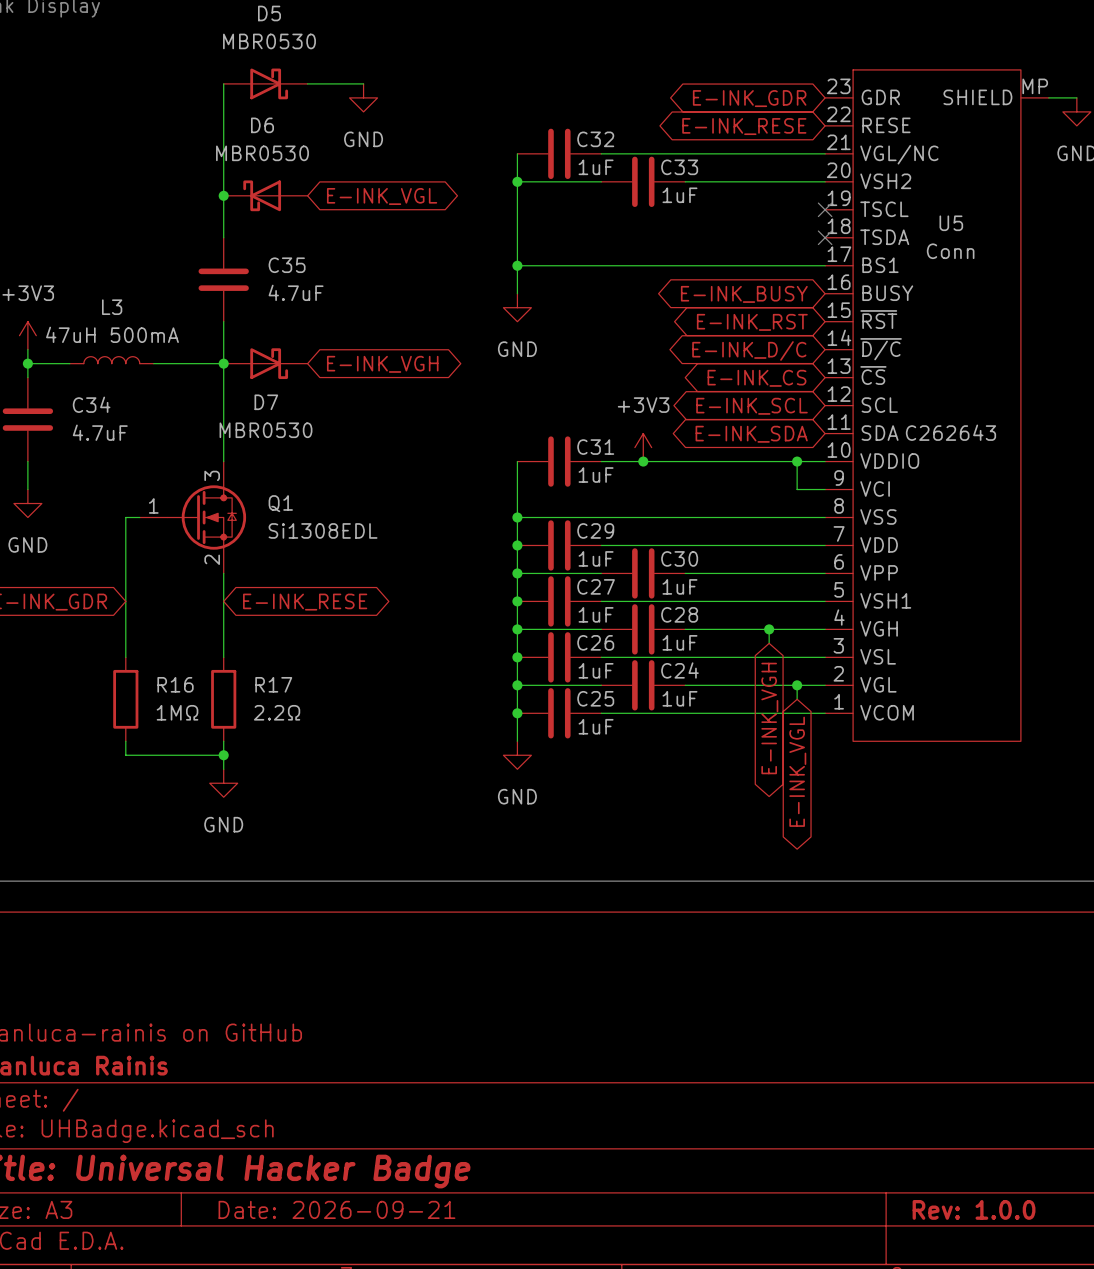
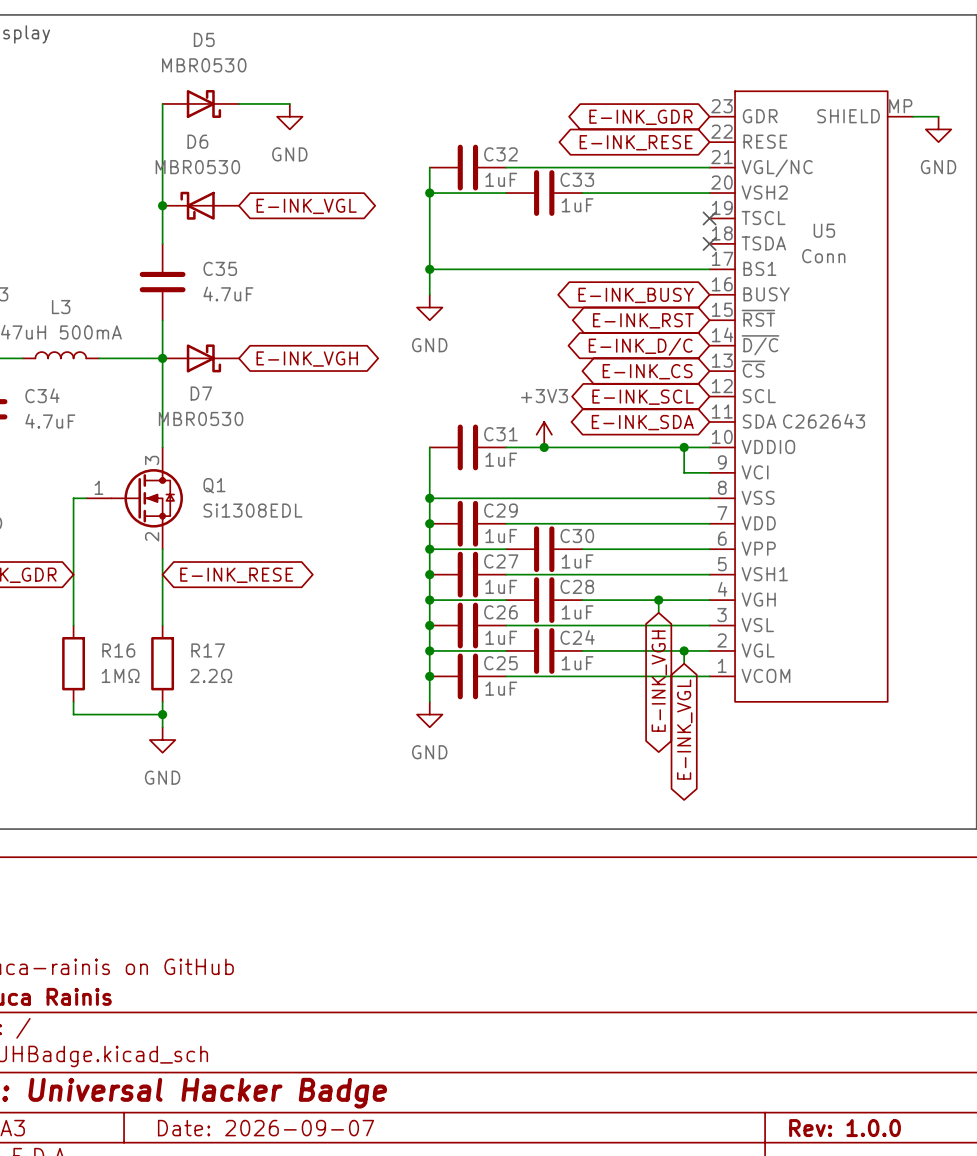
title block: Date: 2026-09-21 (336, 1209) -> Date: 2026-09-07 (265, 1128)

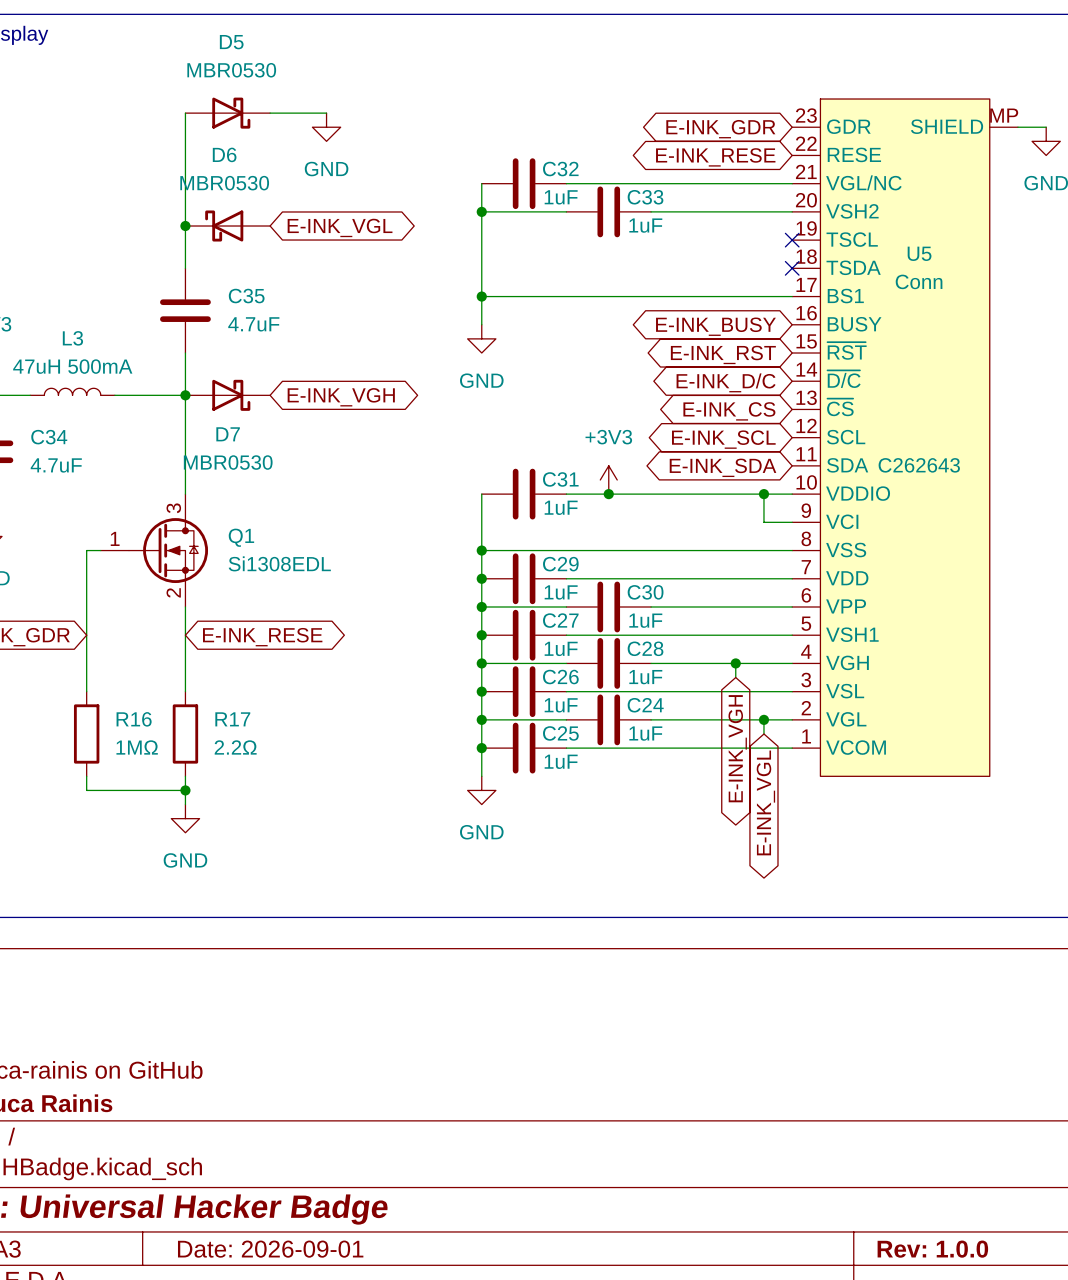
title block: Date: 2026-09-07 (265, 1128) -> Date: 2026-09-01 (270, 1249)

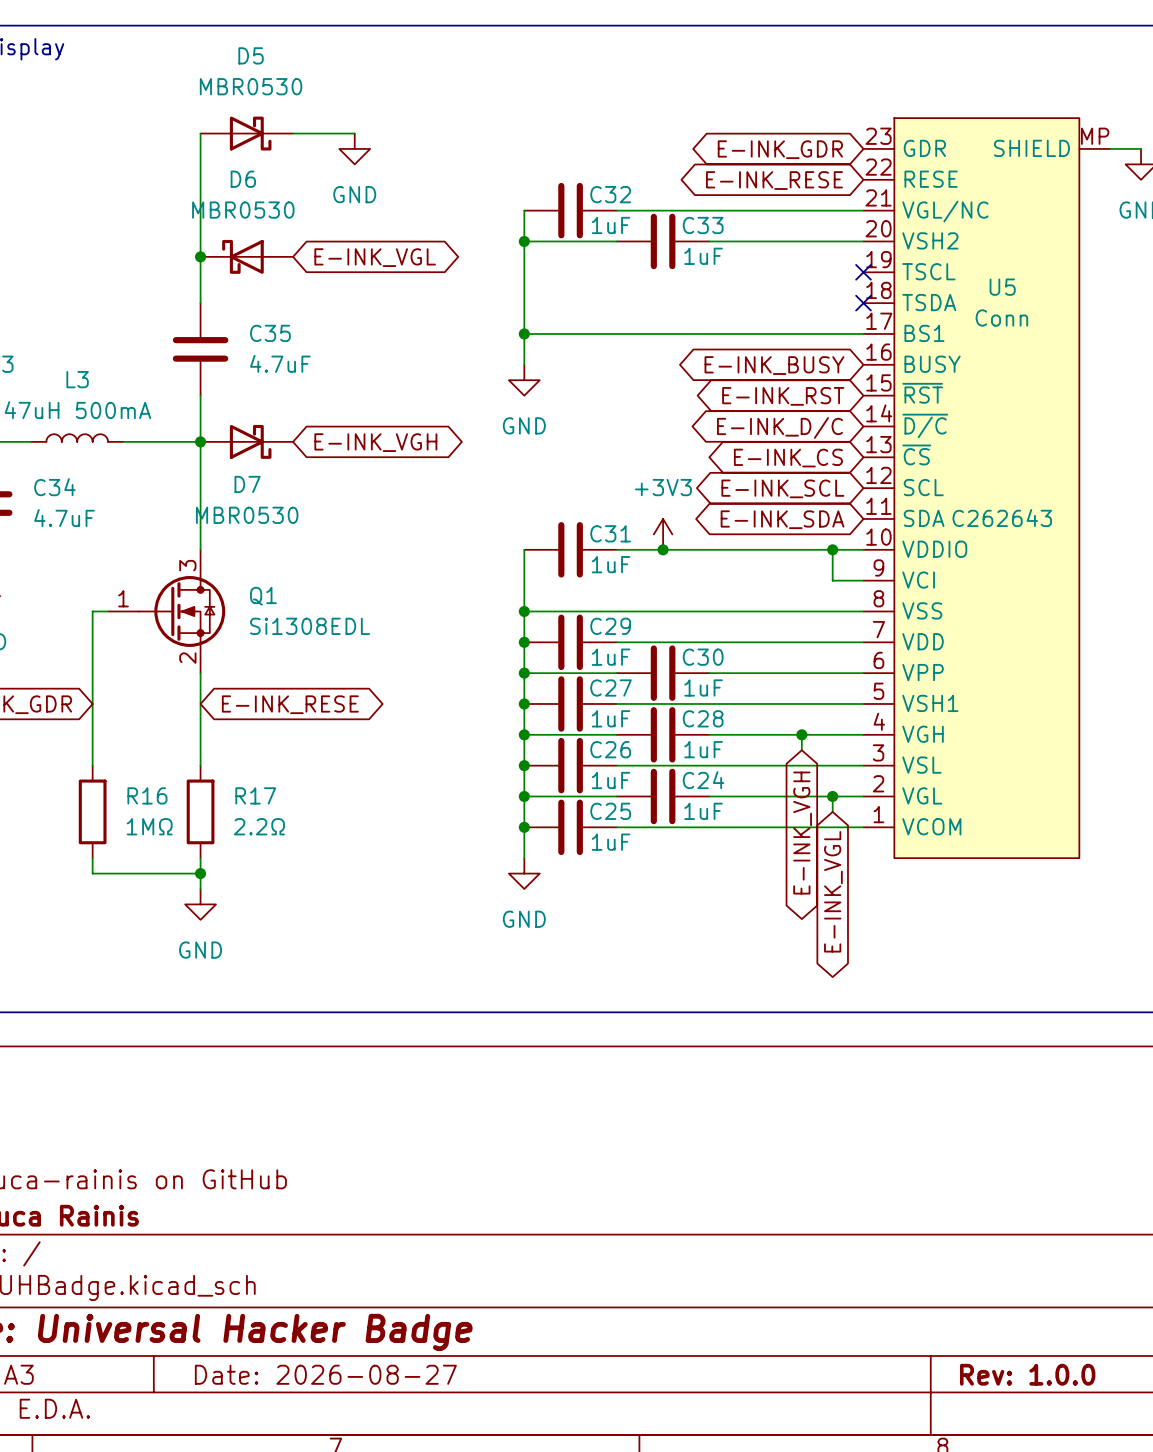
title block: Date: 2026-09-01 (270, 1249) -> Date: 2026-08-27 (325, 1374)

